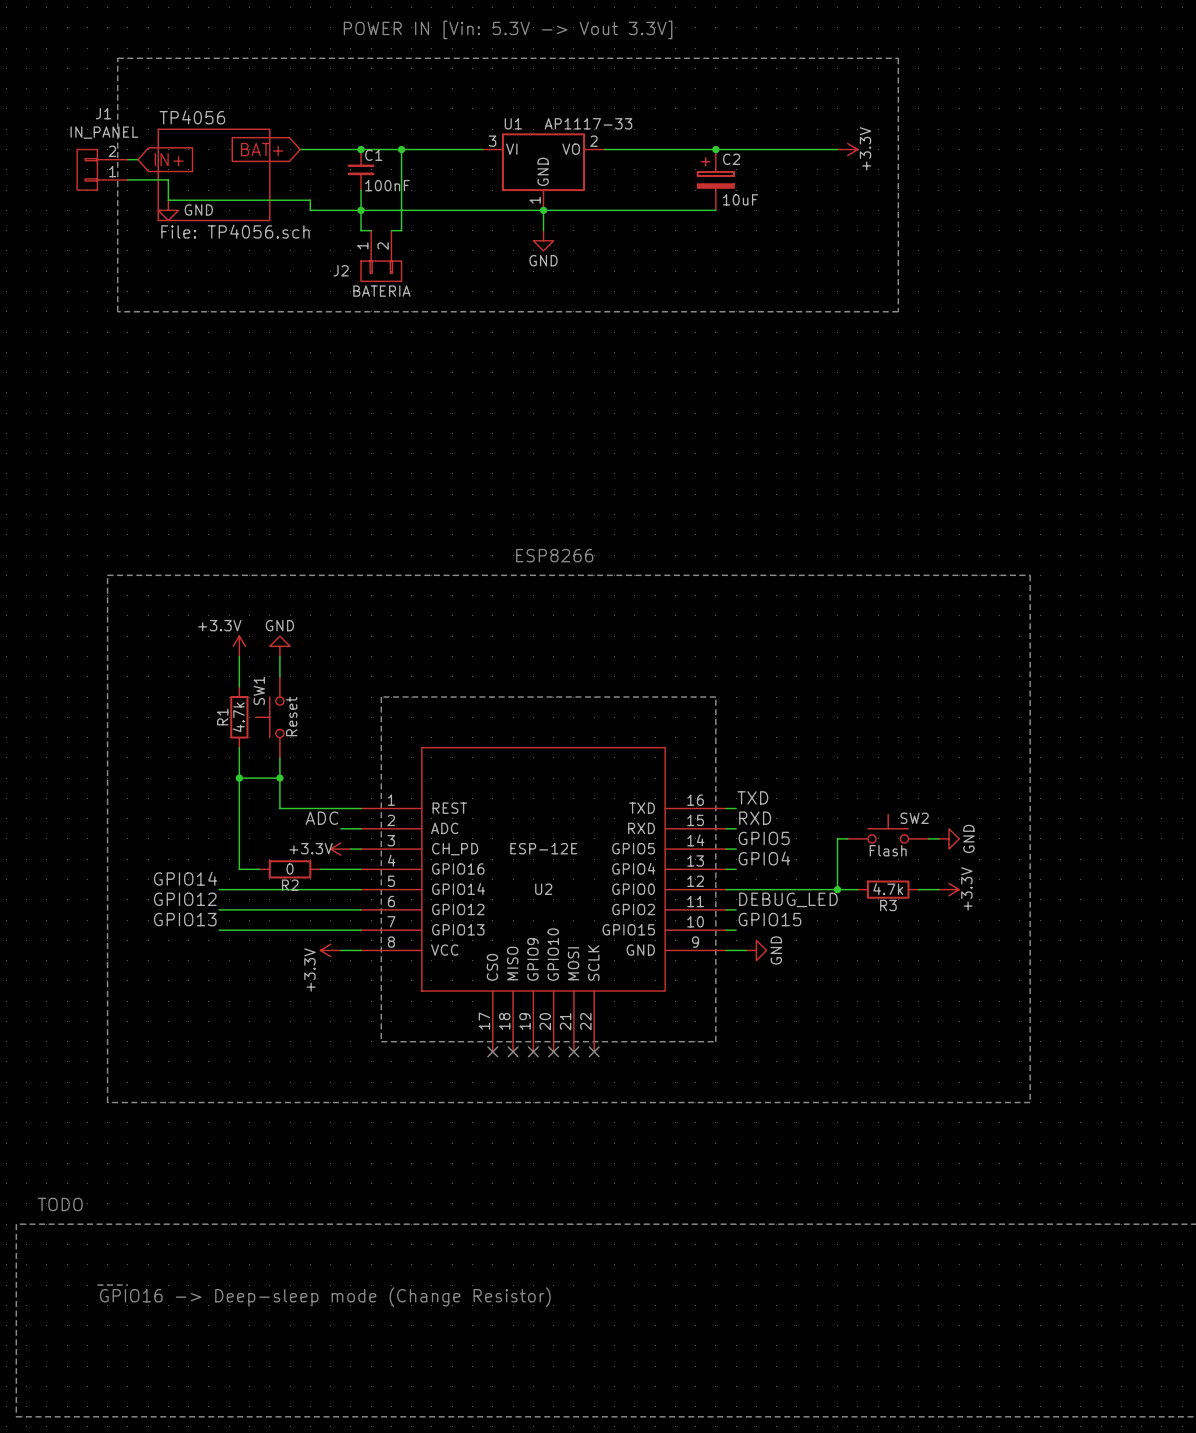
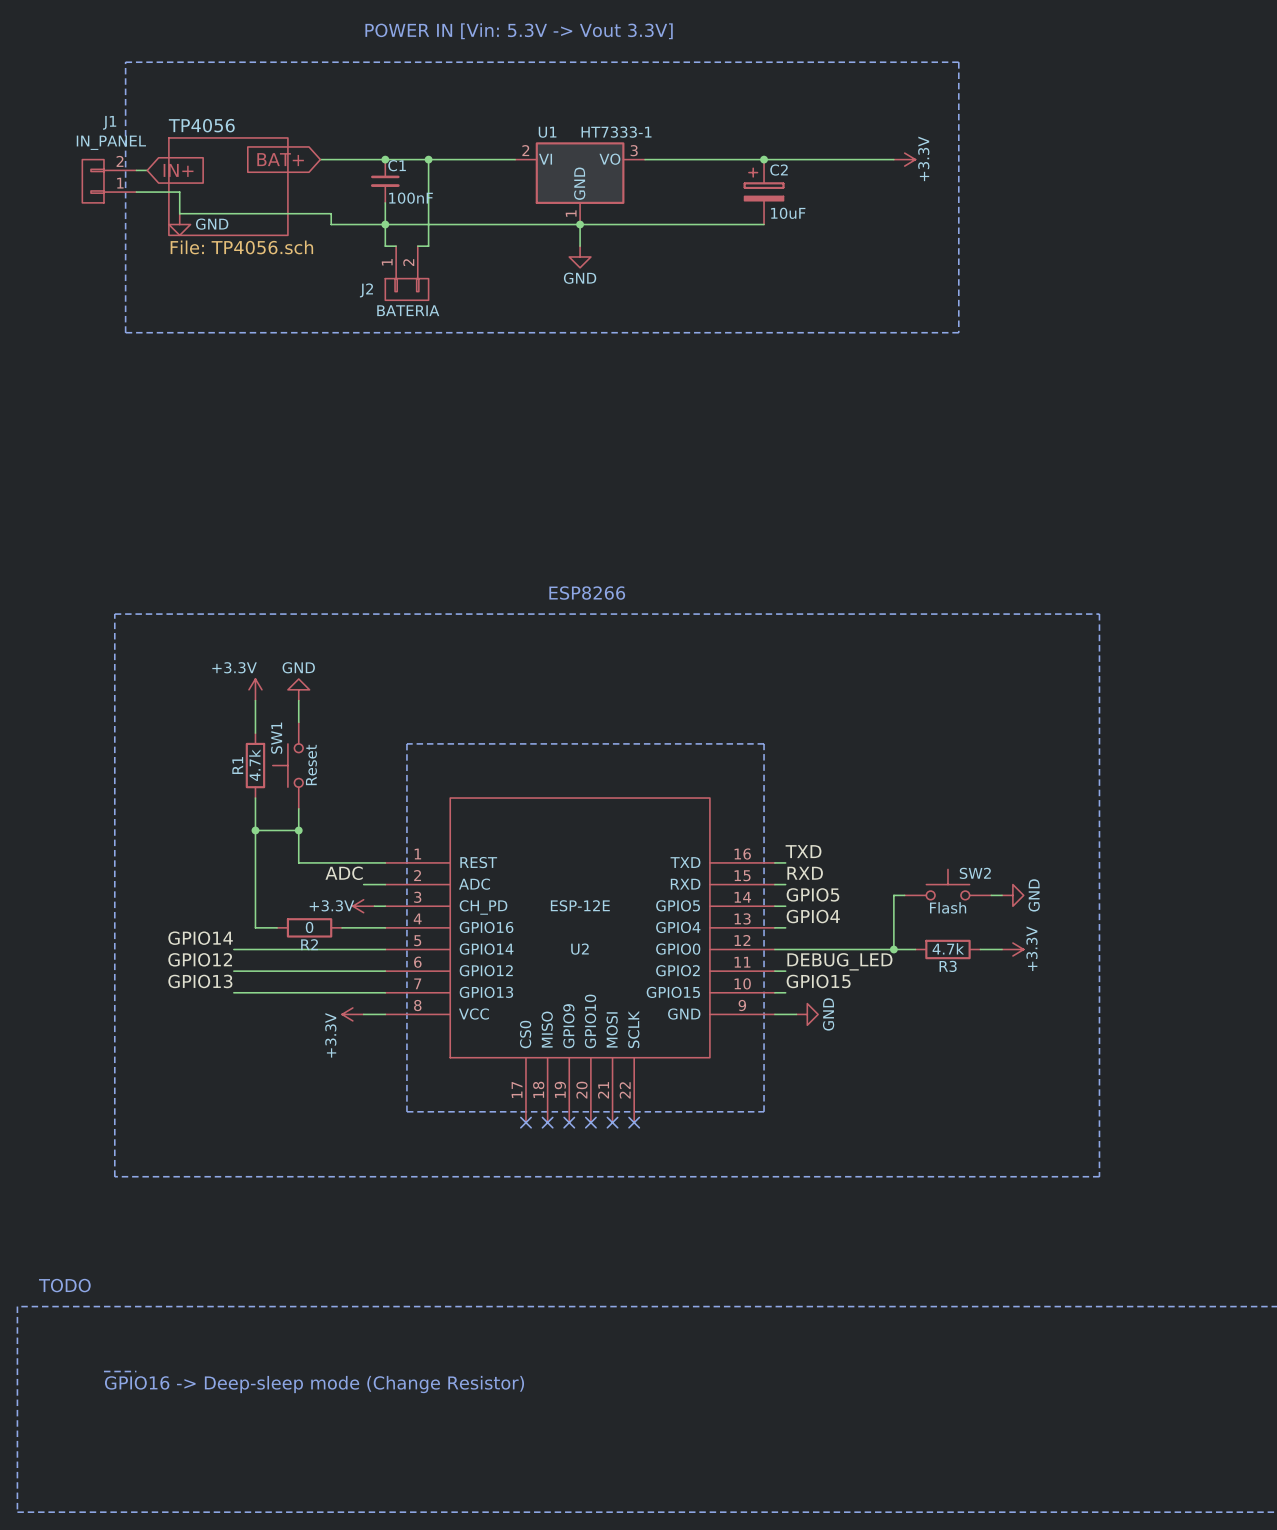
U1 value: AP1117-33 (588, 123) -> HT7333-1 (616, 132)
U1 pin number: 3 (492, 141) -> 2 (525, 150)
U1 pin number: 2 (593, 141) -> 3 (634, 150)

